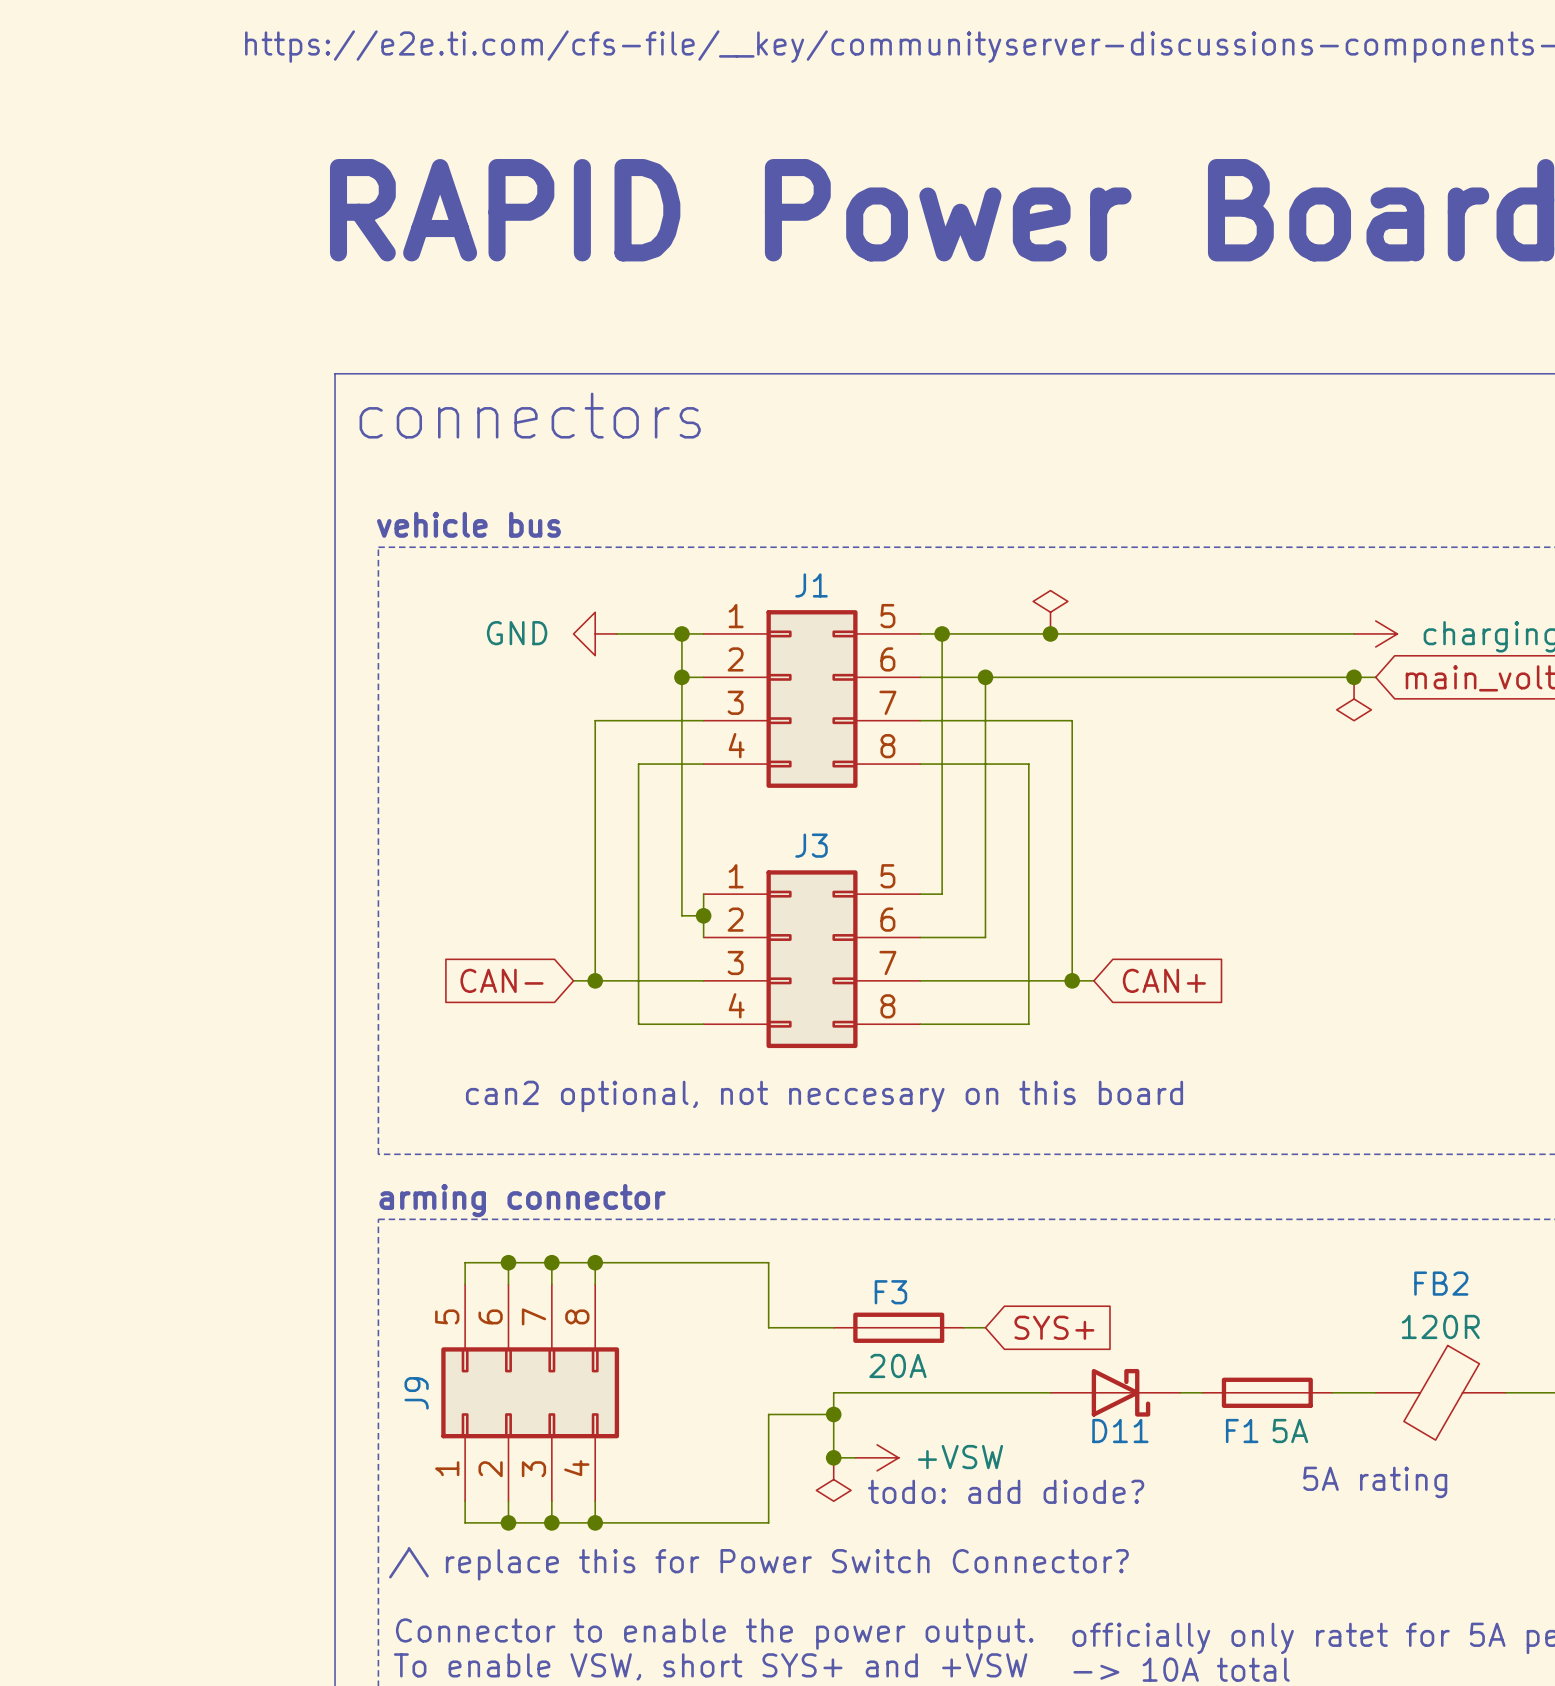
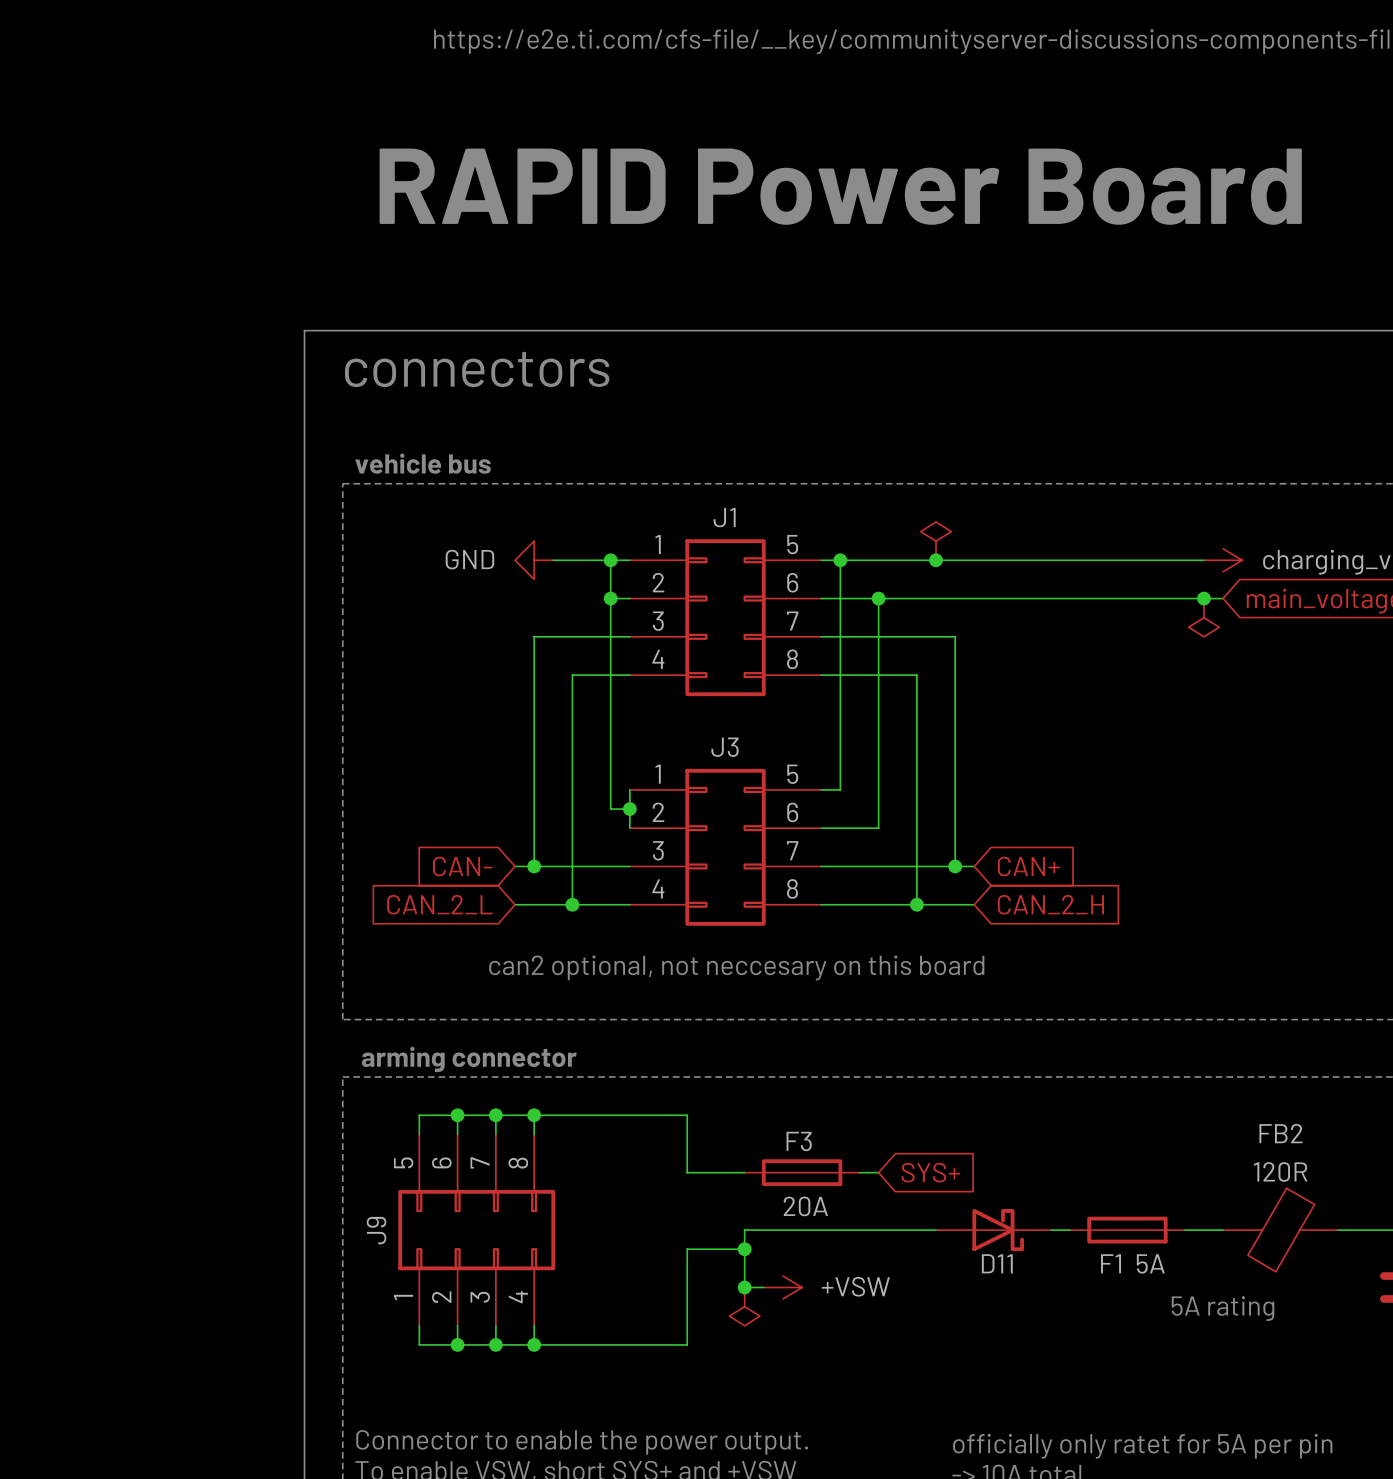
wire: none -> (515, 904) (572, 904)
junction: none -> (572, 904)
wire: none -> (916, 904) (974, 904)
junction: none -> (916, 904)
global label: none -> CAN_2_L (439, 904)
global label: none -> CAN_2_H (1050, 904)
text: todo: add diode? (1006, 1491) -> none
text: /\ replace this for Power Switch Connector? (758, 1563) -> none

